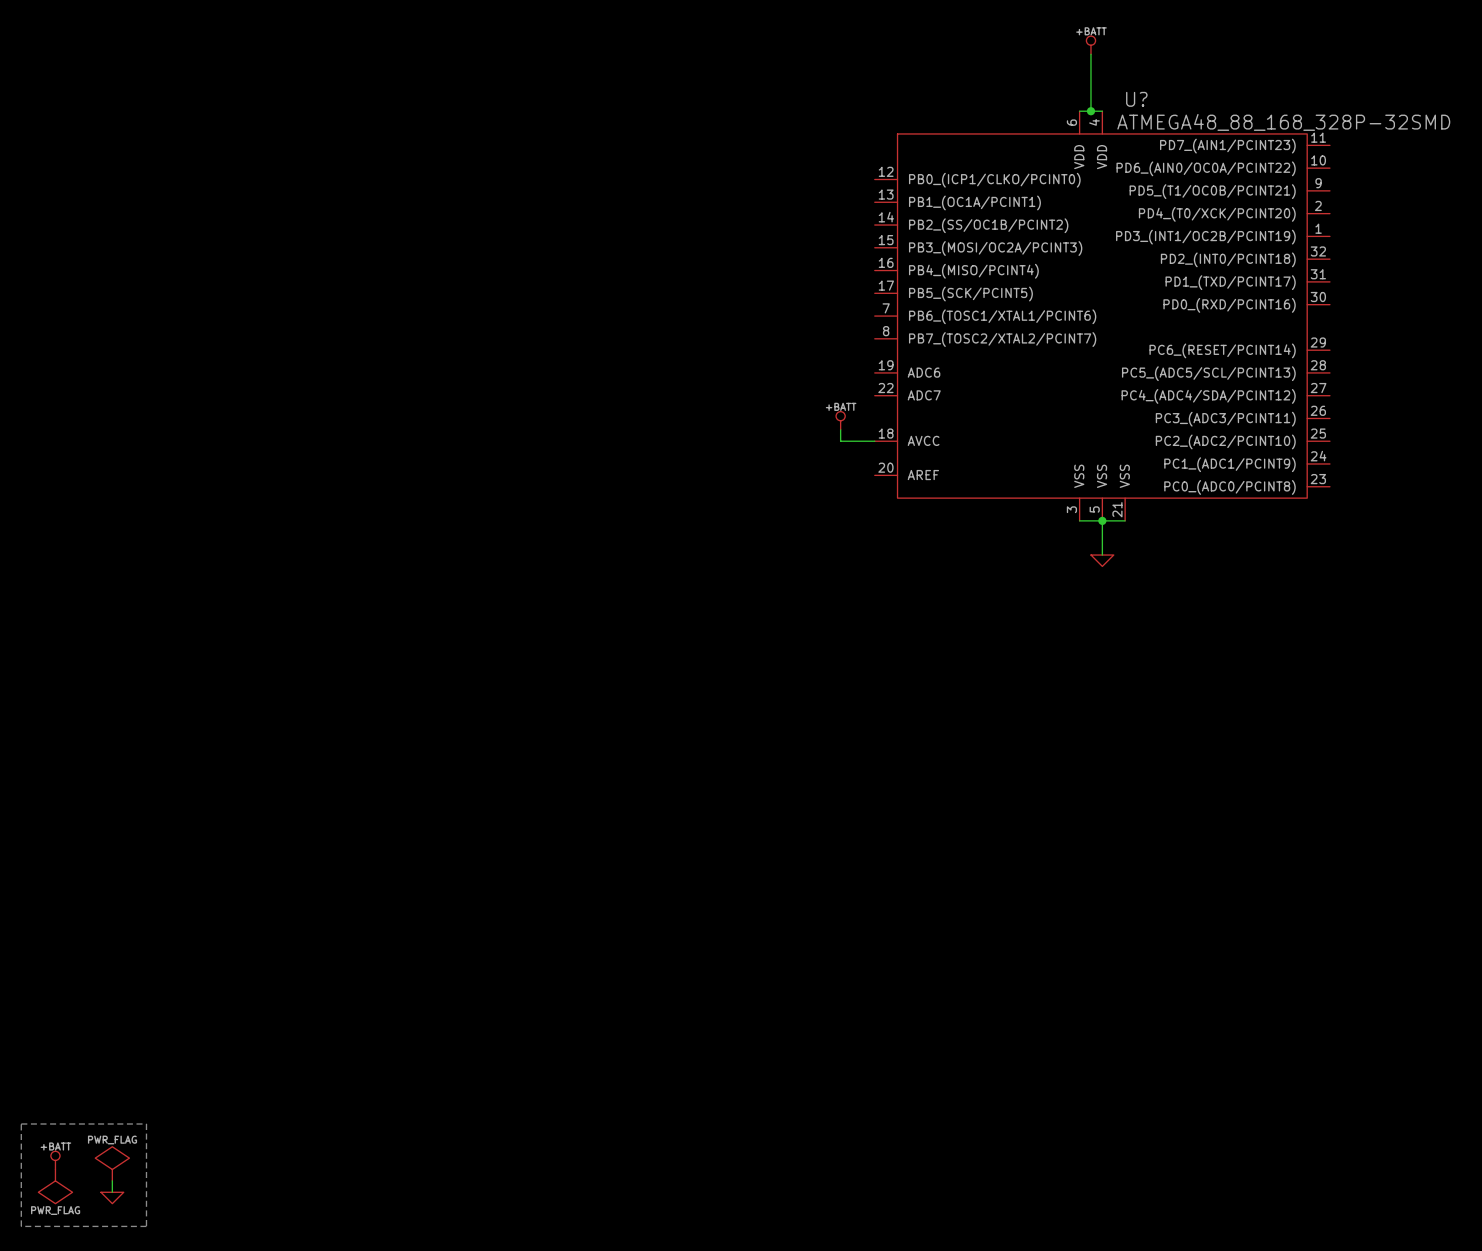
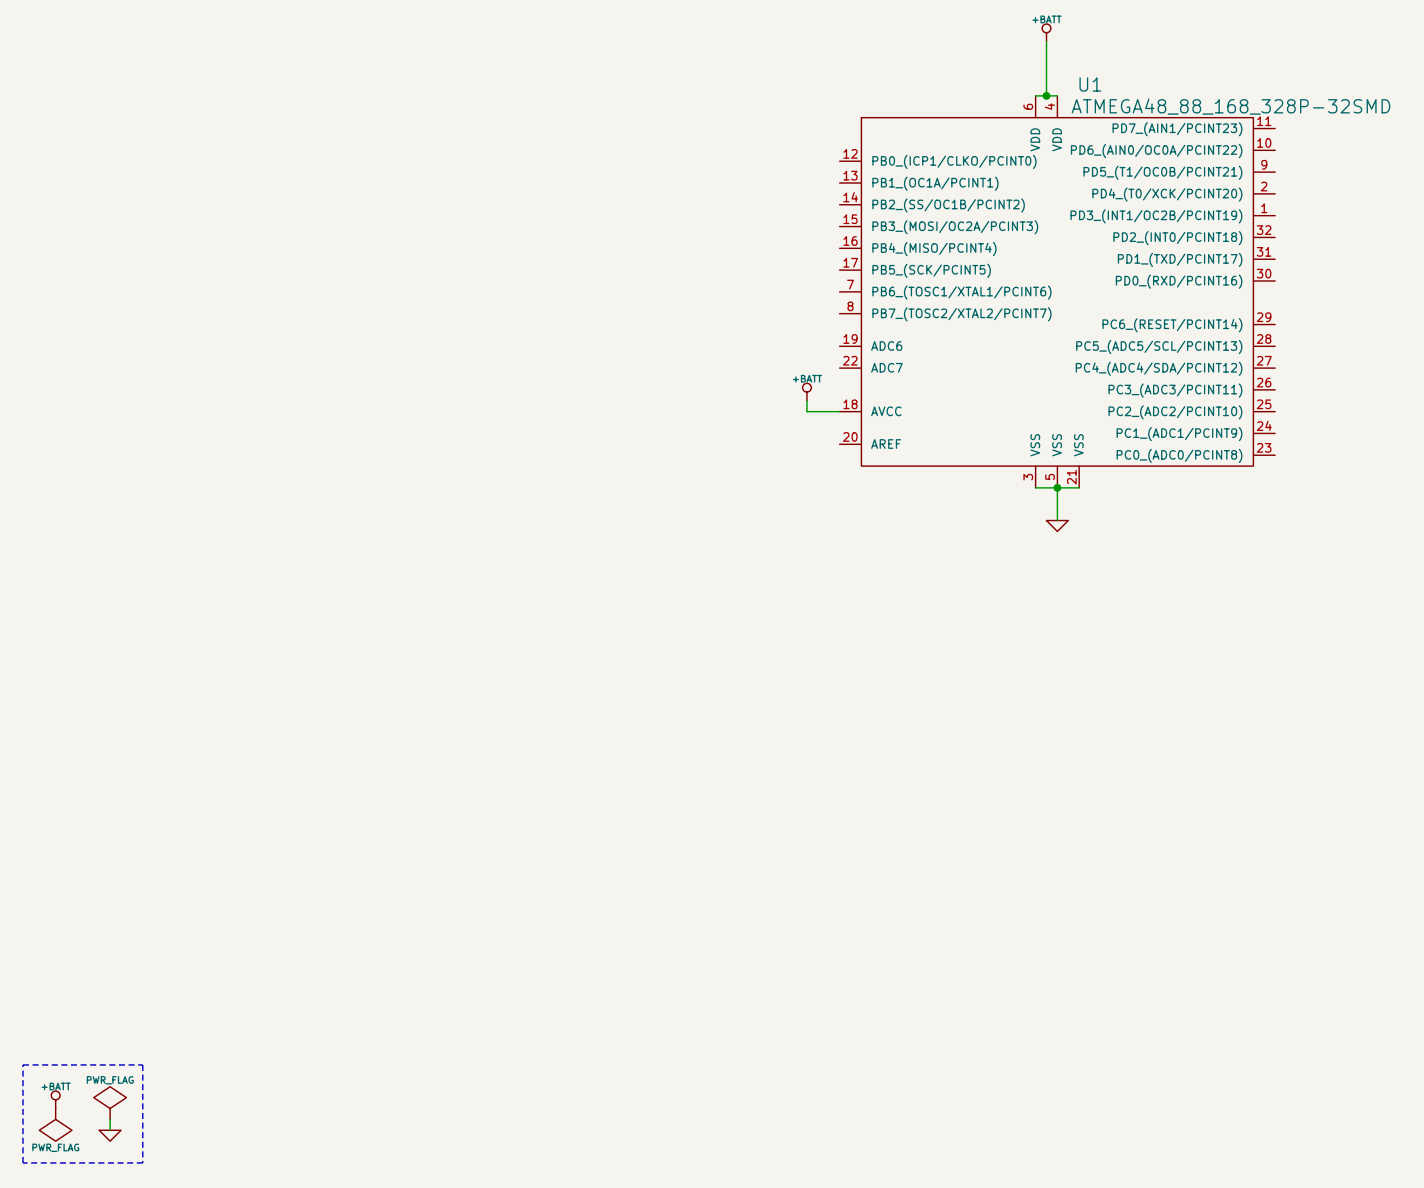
U? name: U? (1136, 99) -> U1 (1090, 84)

